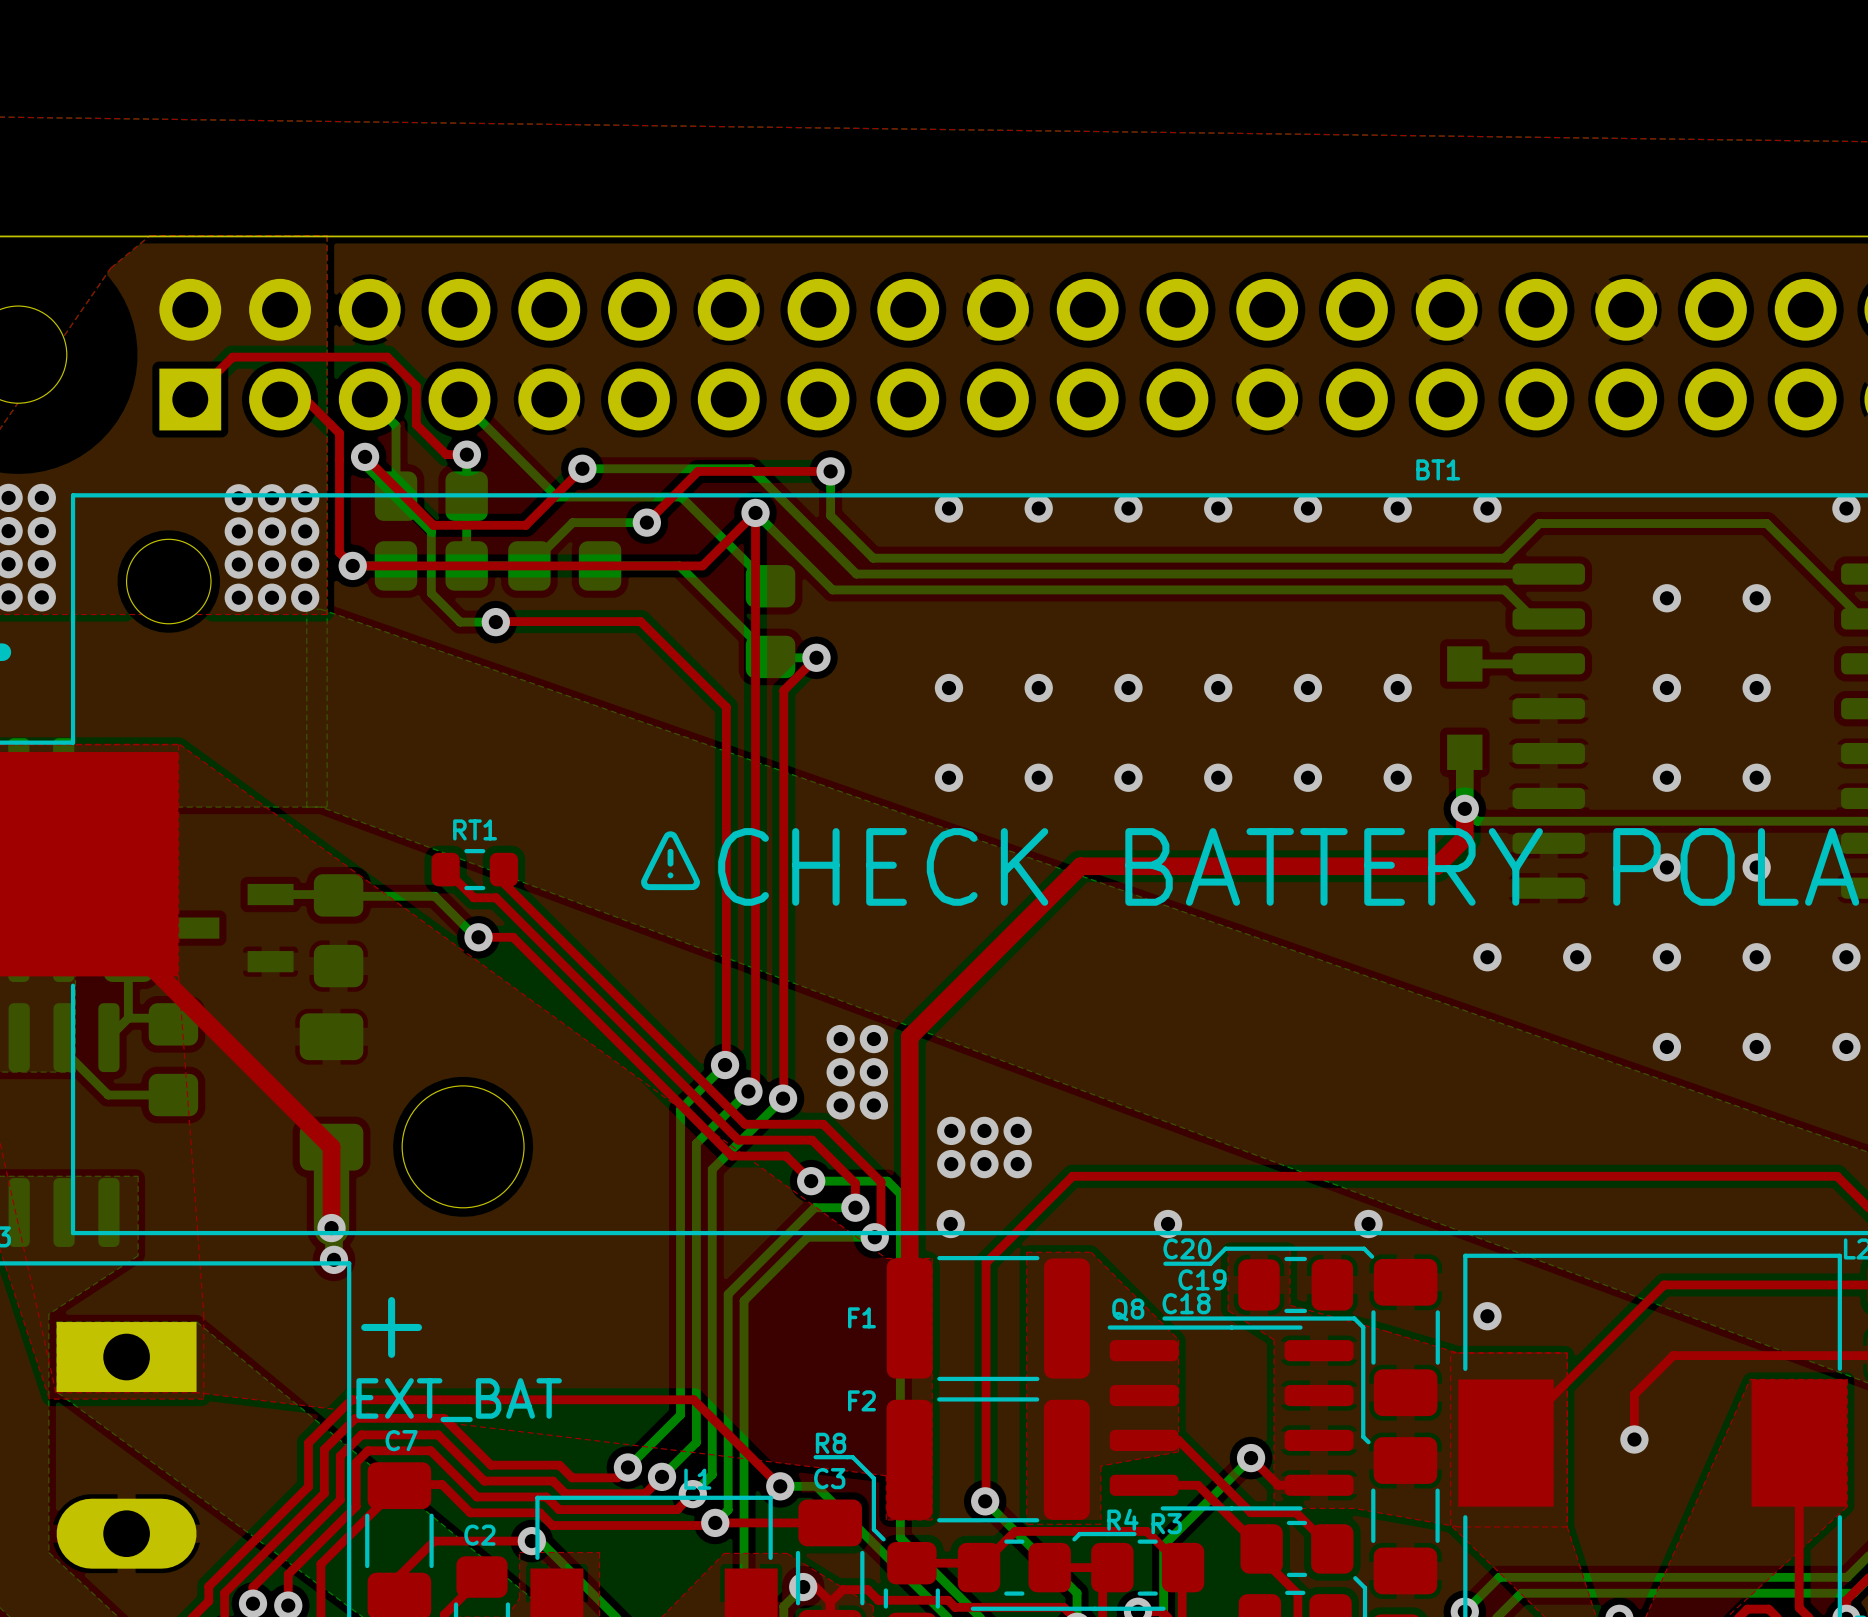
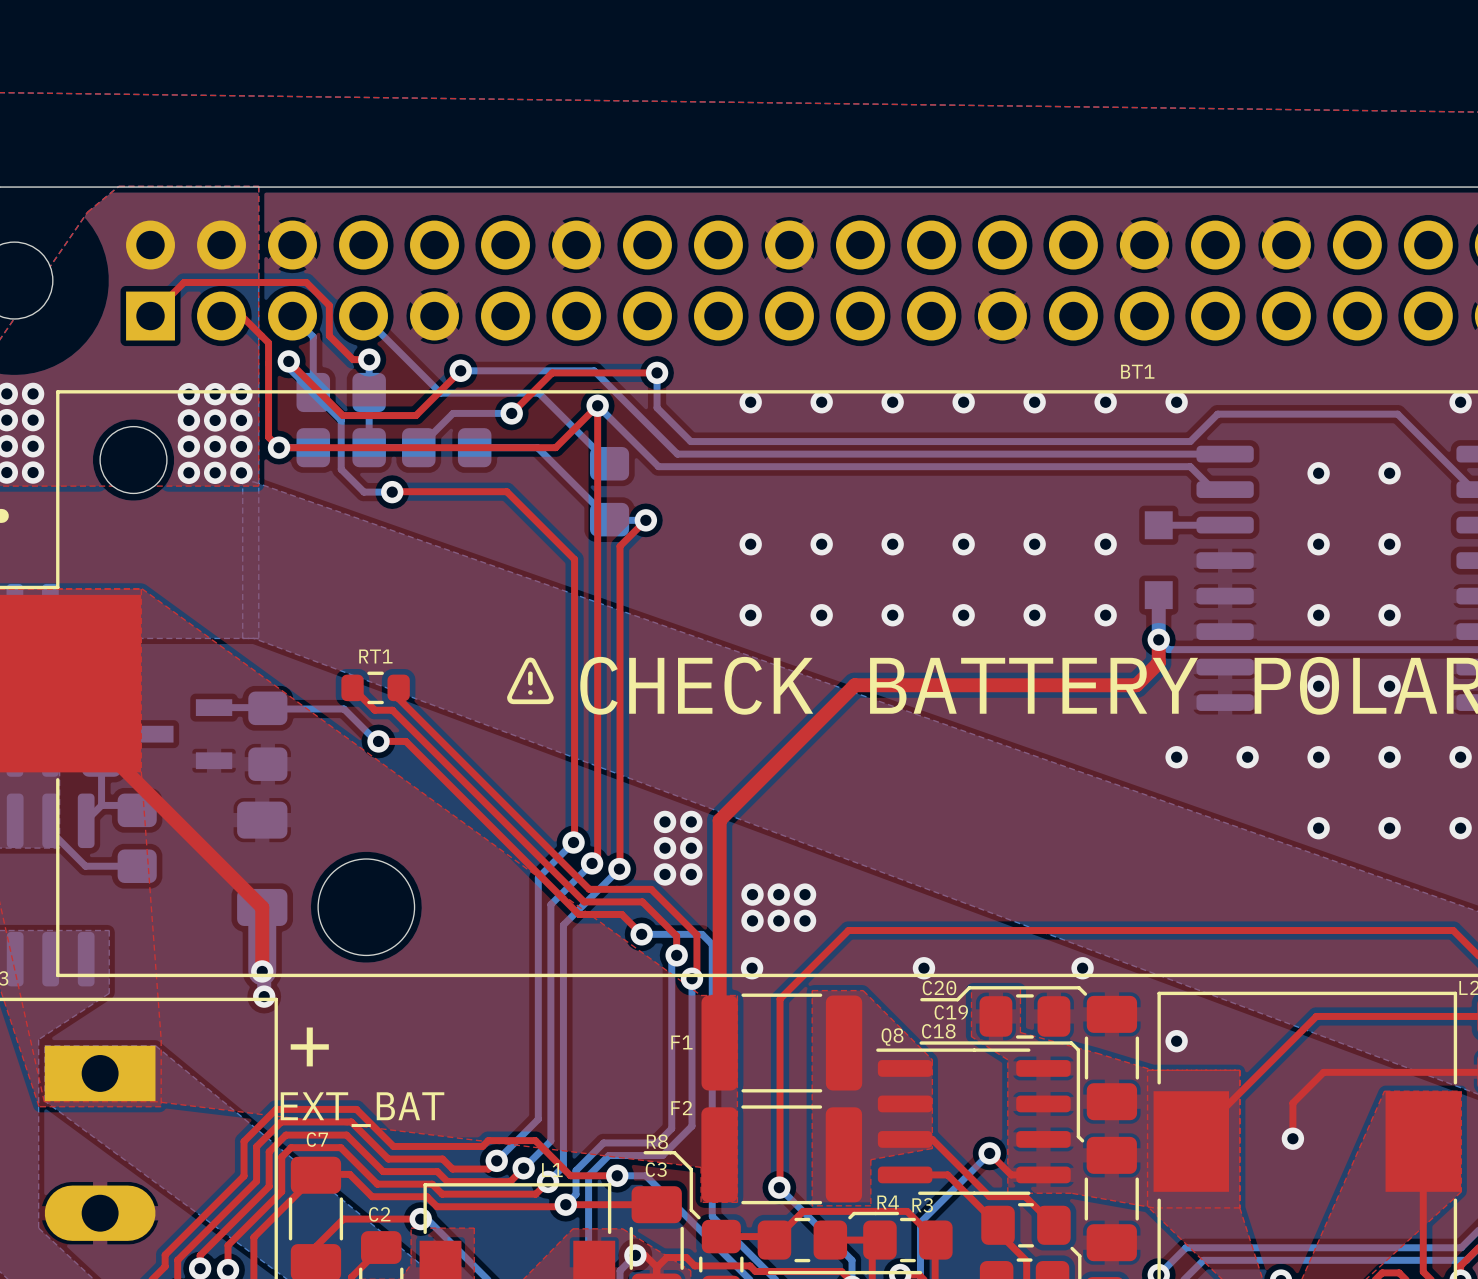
bottom track: (855, 1207) (814, 1207) (728, 1294) (728, 1479) -> (676, 955) (671, 960) (671, 1128) (657, 1142) (603, 1142) (576, 1170)
bottom track: (874, 1237) (807, 1237) (744, 1300) (744, 1486) -> (692, 978) (692, 1126) (662, 1155) (608, 1155) (588, 1175)
top track: (349, 1402) (351, 1399) (693, 1399) (780, 1486) -> (276, 1109) (356, 1109) (393, 1146) (482, 1146) (488, 1140) (535, 1140) (570, 1175) (617, 1175)

